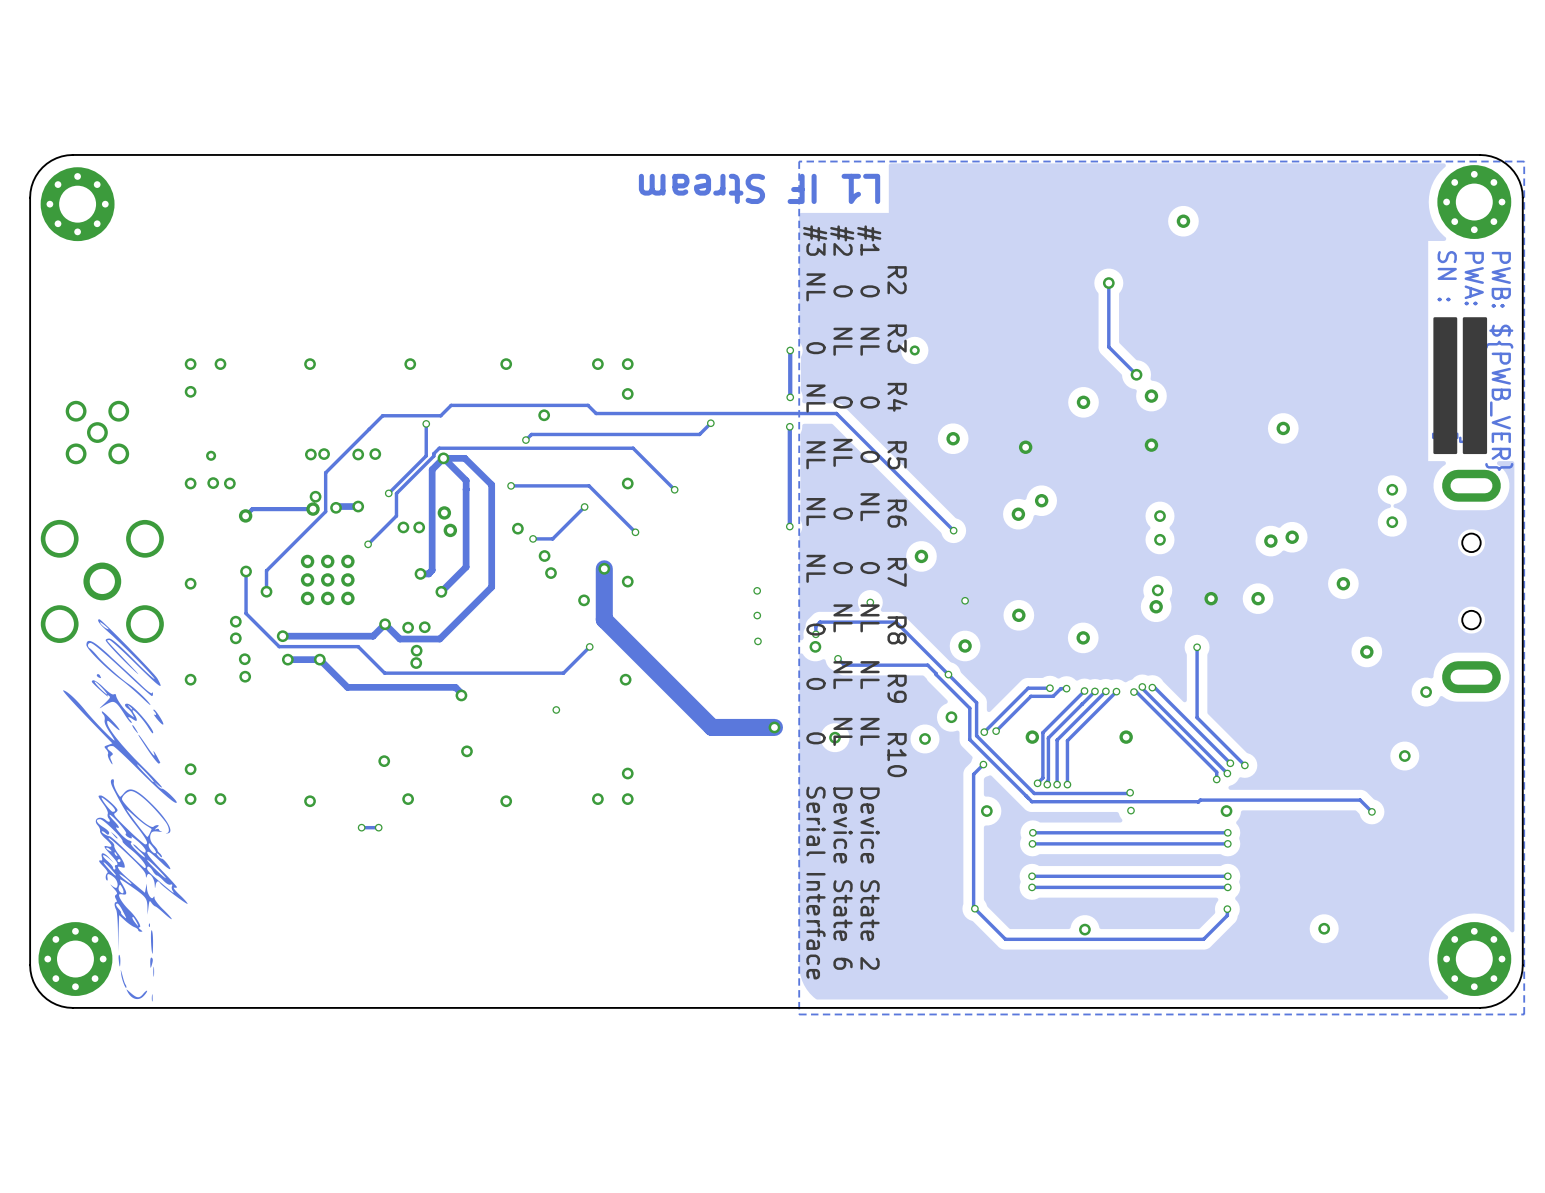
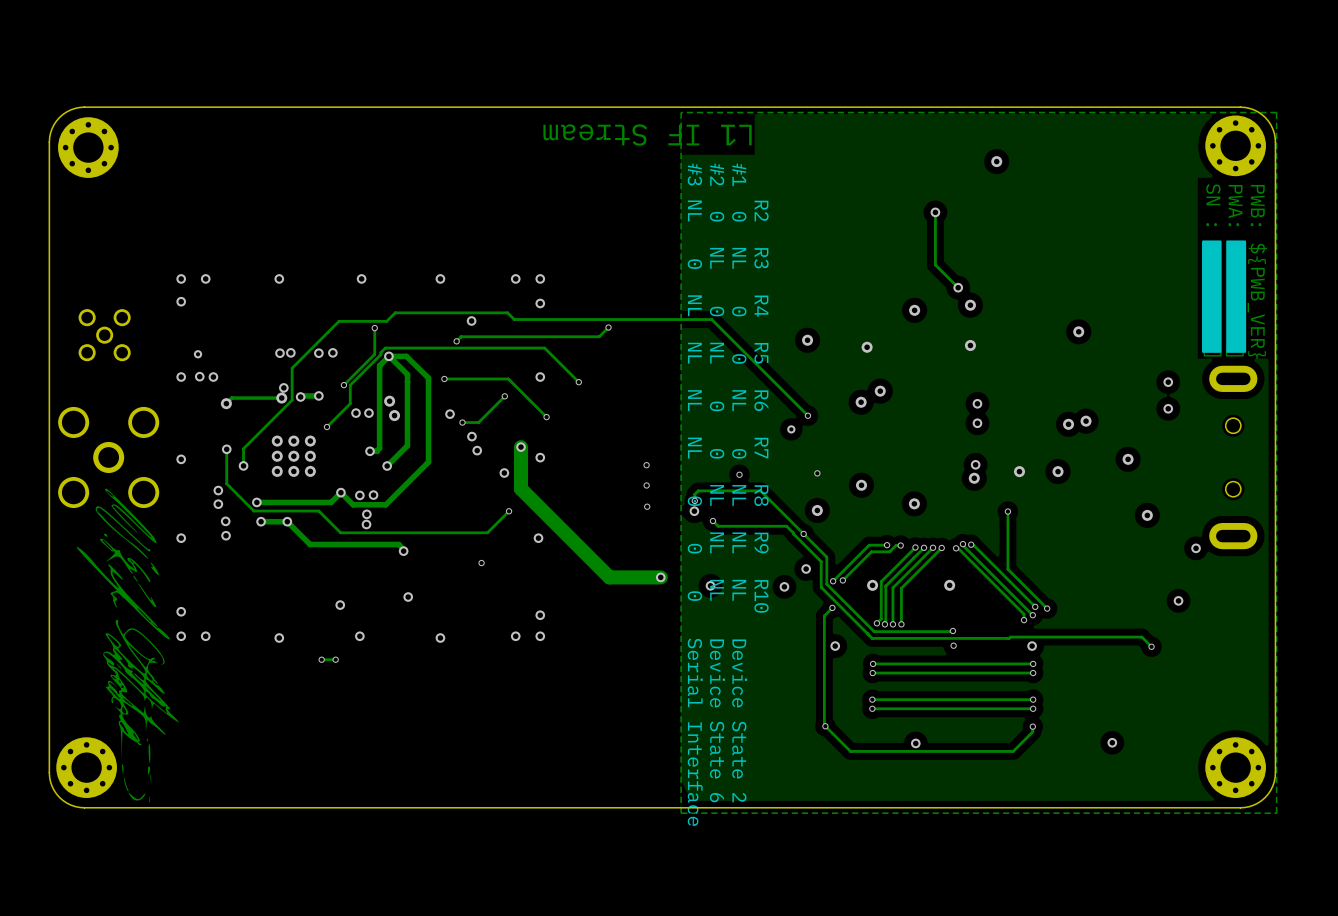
track: (790, 350) (790, 397) -> none
via: (790, 350) -> none
via: (914, 350) -> none
via: (790, 397) -> none
track: (789, 426) (789, 526) -> none
via: (789, 426) -> none
via: (789, 526) -> none
via: none -> (791, 429)
via: (921, 556) -> none

